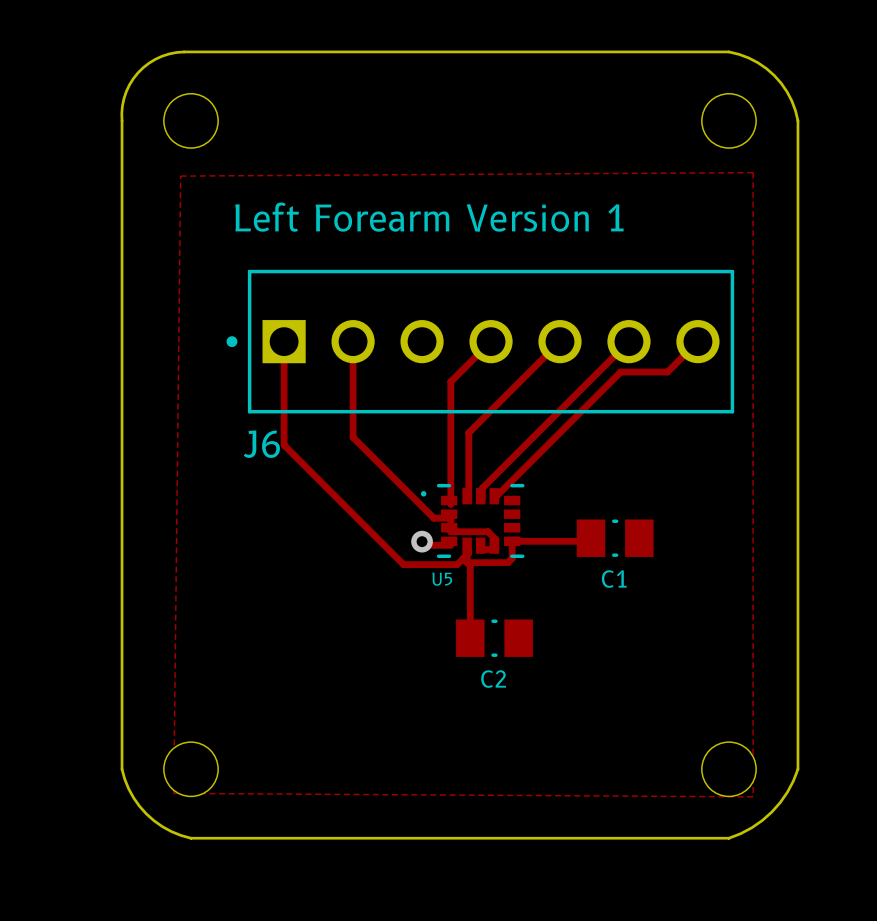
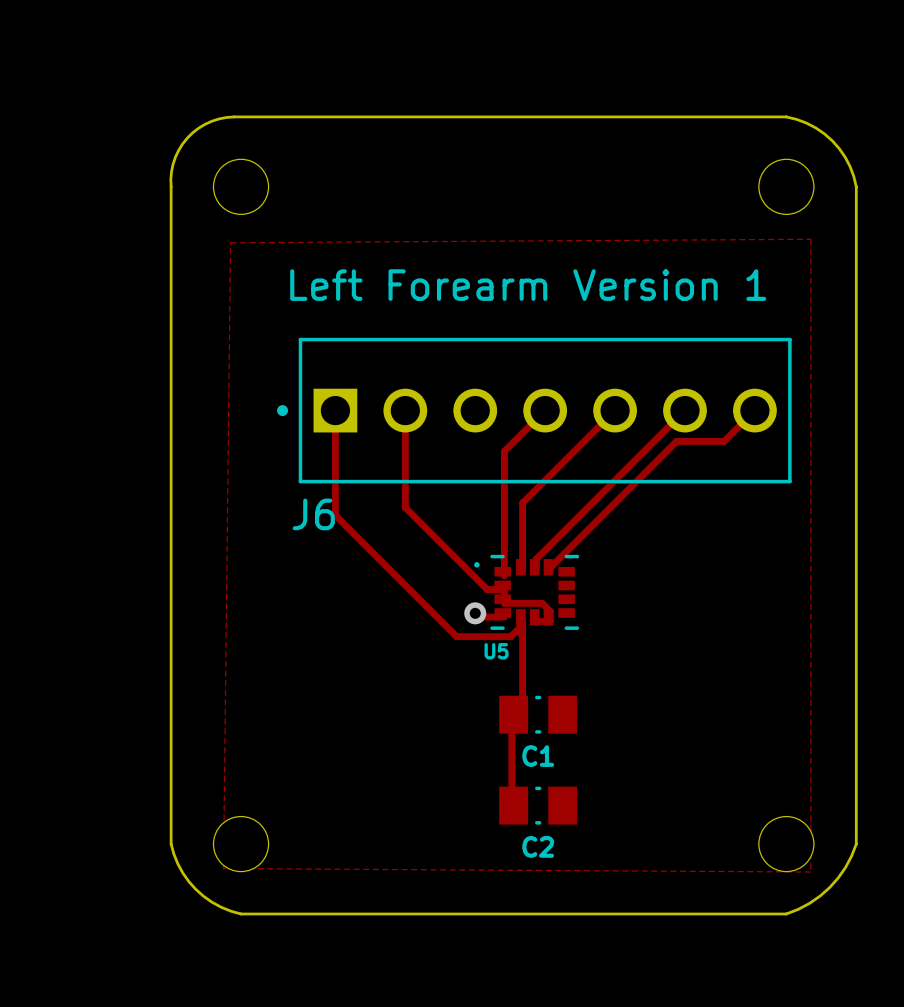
track: (591, 538) (587, 541) (512, 541) (512, 558) (507, 562) (467, 562) -> none
C1 position: (615, 538) -> (538, 714)
track: none -> (522, 624) (522, 700) (511, 711)
track: (463, 558) (470, 565) (470, 638) -> none
C2 position: (494, 638) -> (538, 805)
track: none -> (511, 718) (511, 805)

